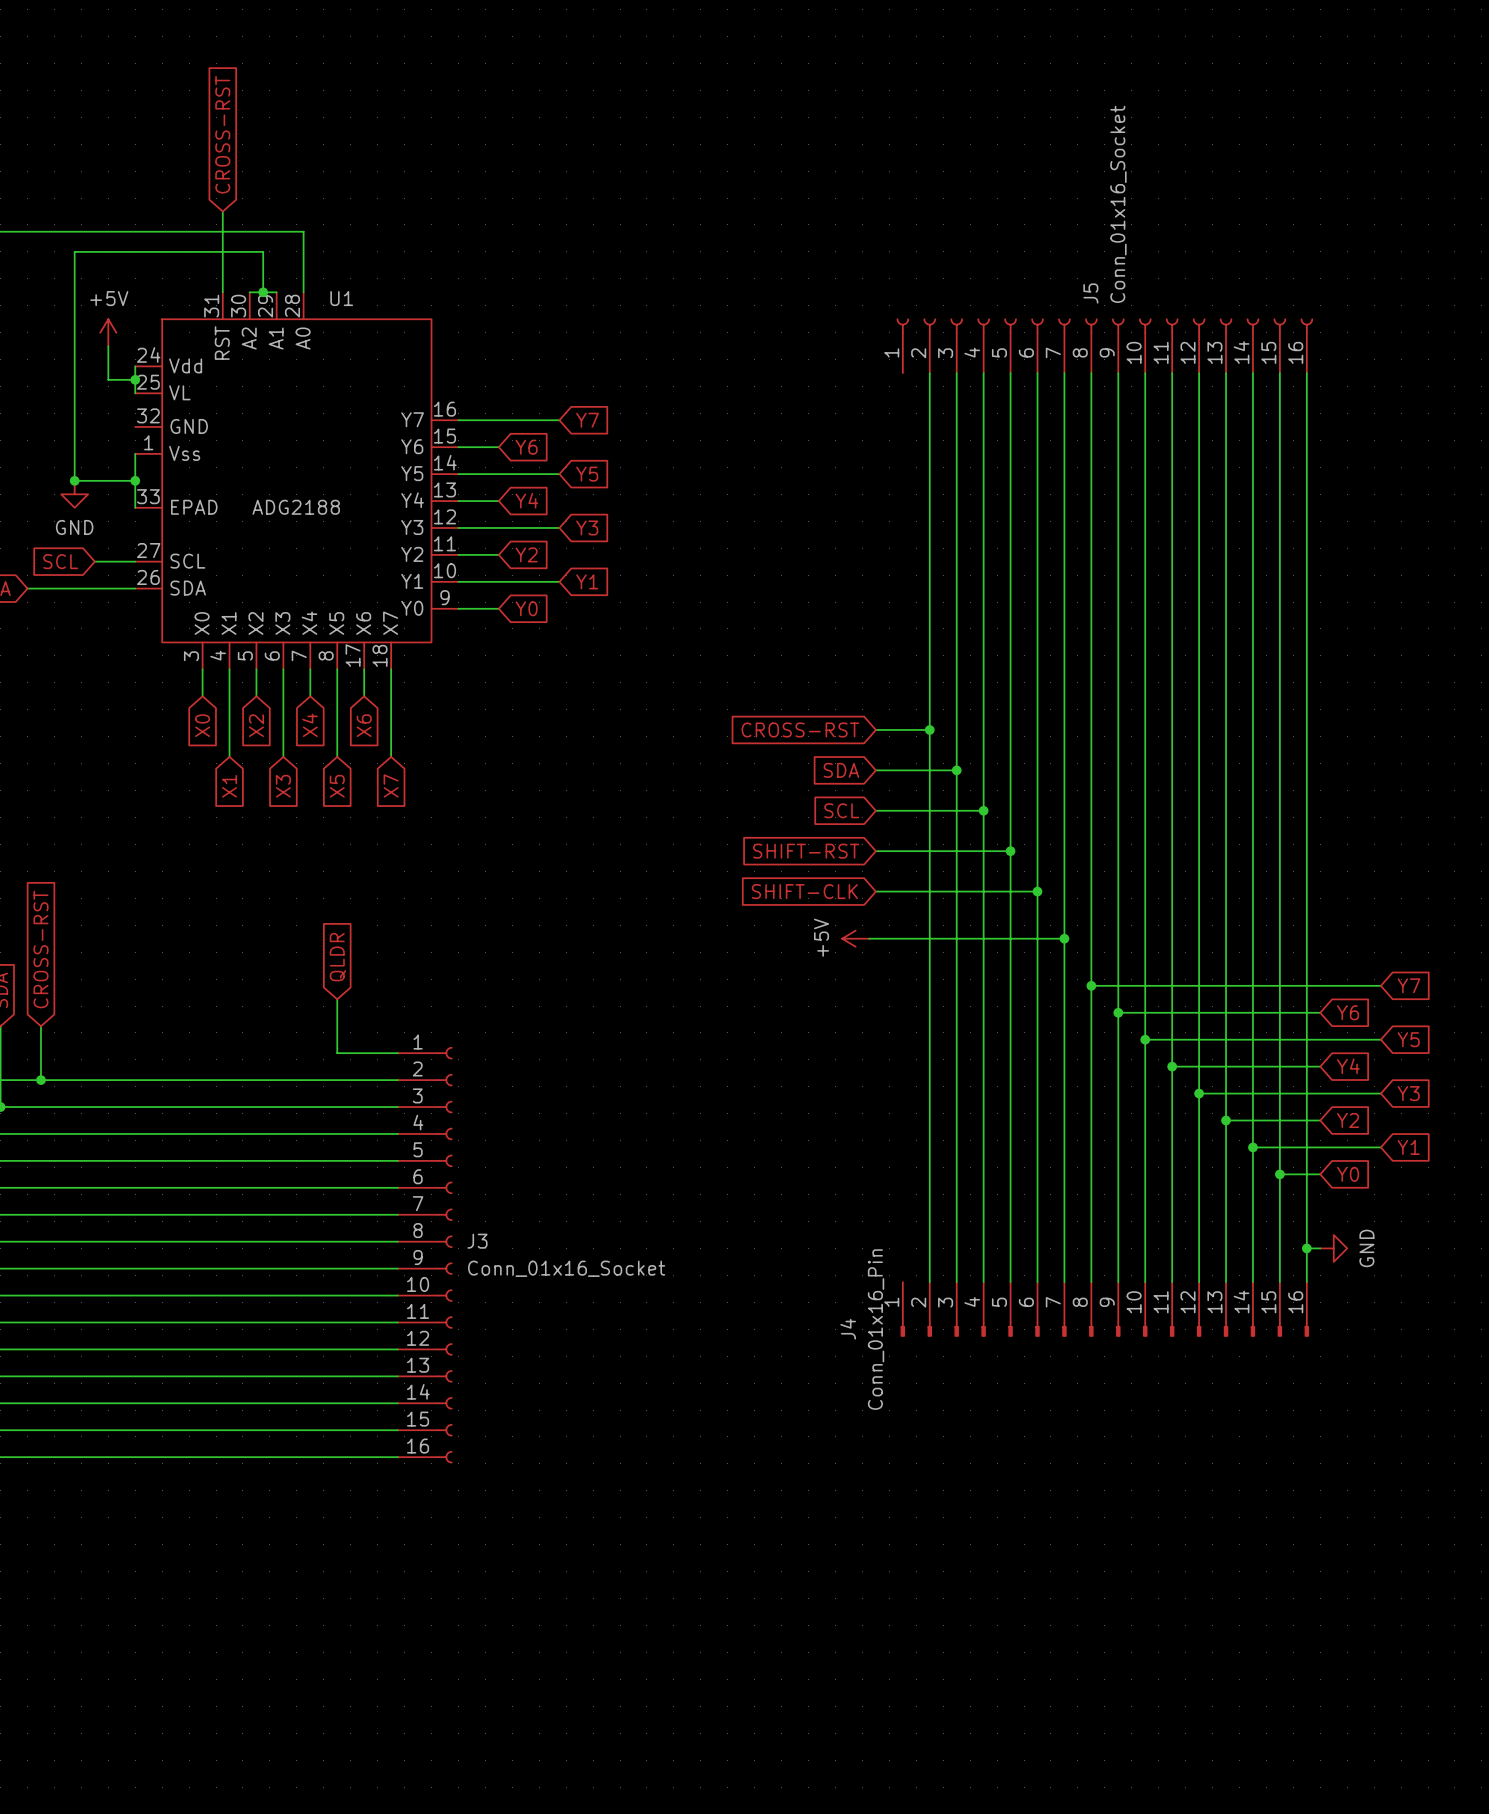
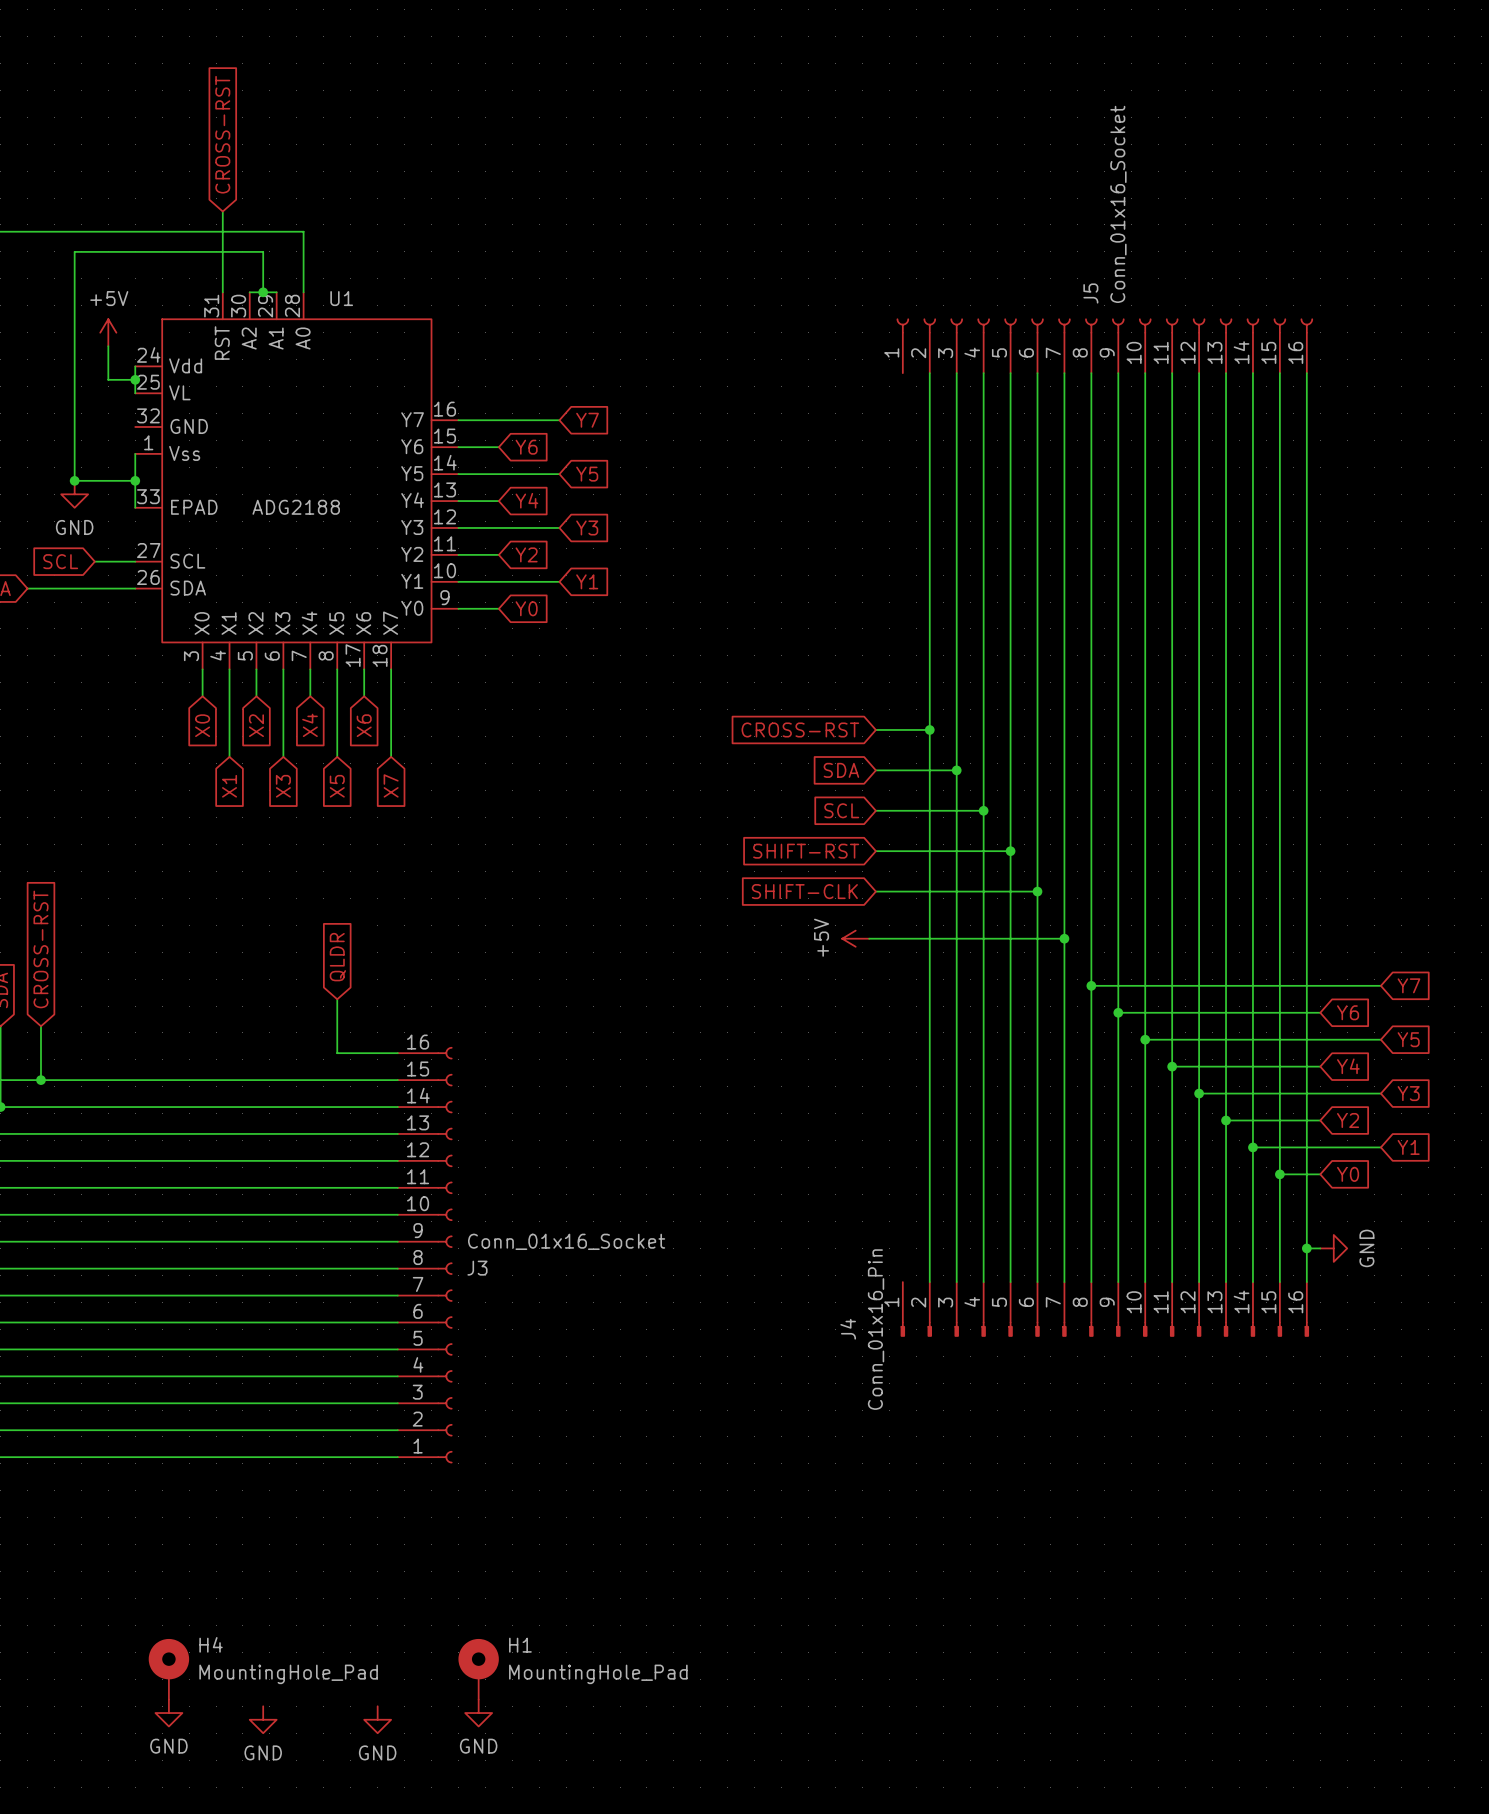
J3 flip: as is (444, 1255) -> up-down (444, 1255)
H4: none -> MountingHole_Pad (168, 1669)
H1: none -> MountingHole_Pad (478, 1669)
power symbol: none -> GND (168, 1713)
power symbol: none -> GND (478, 1713)
power symbol: none -> GND (263, 1719)
power symbol: none -> GND (377, 1719)

